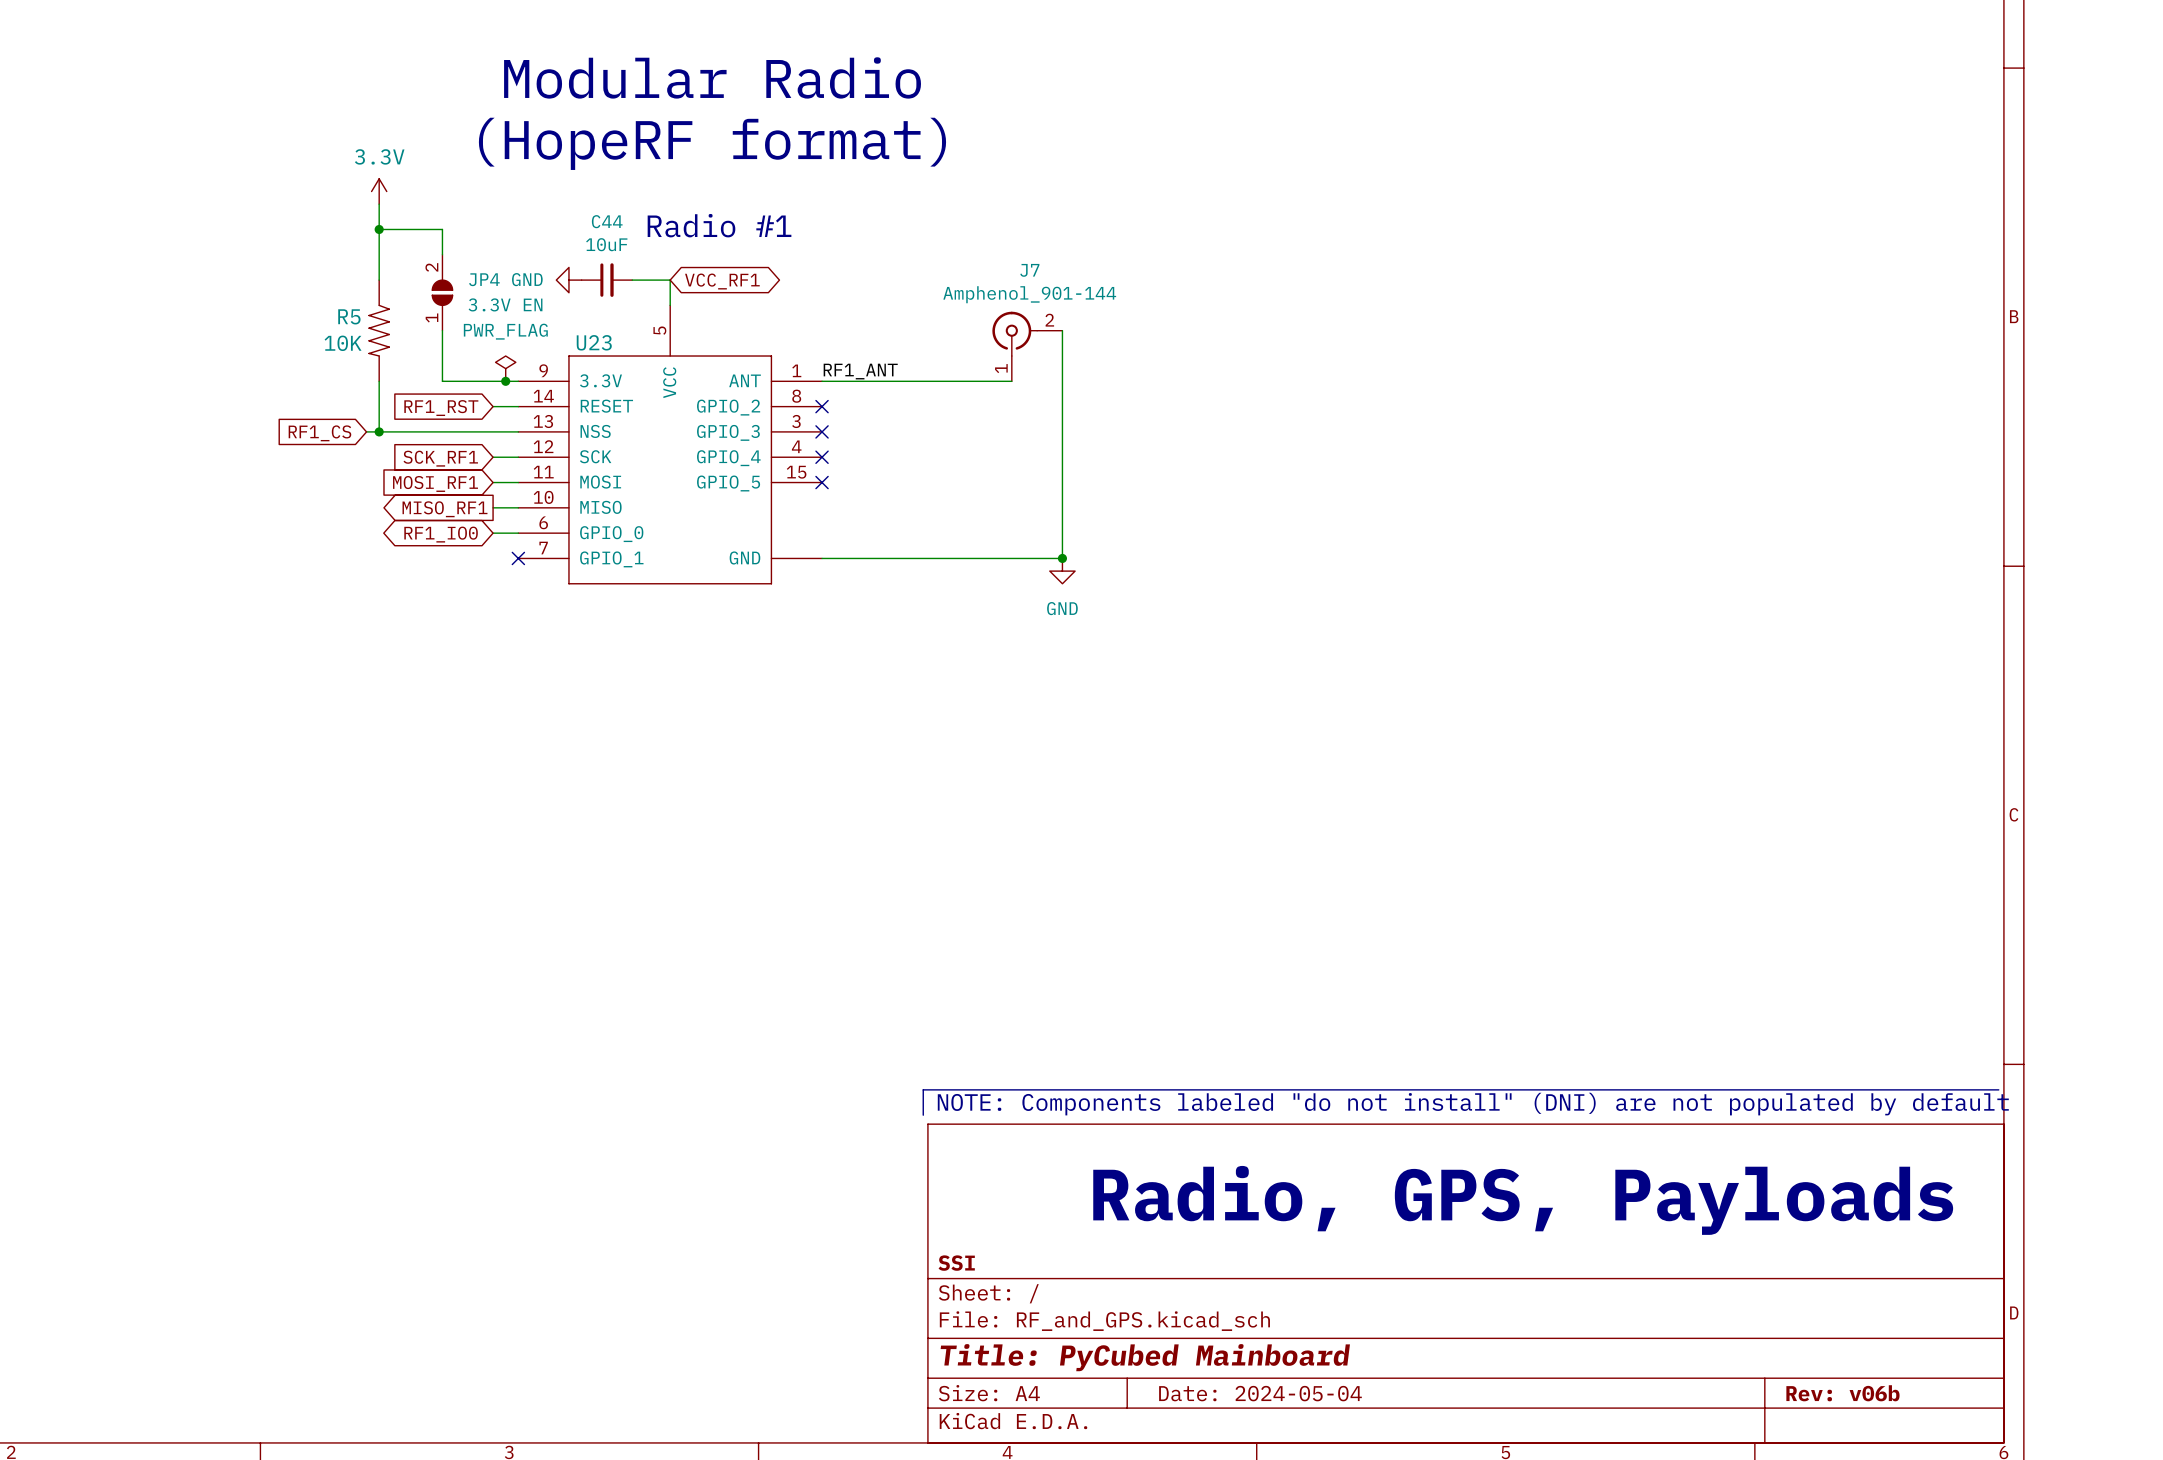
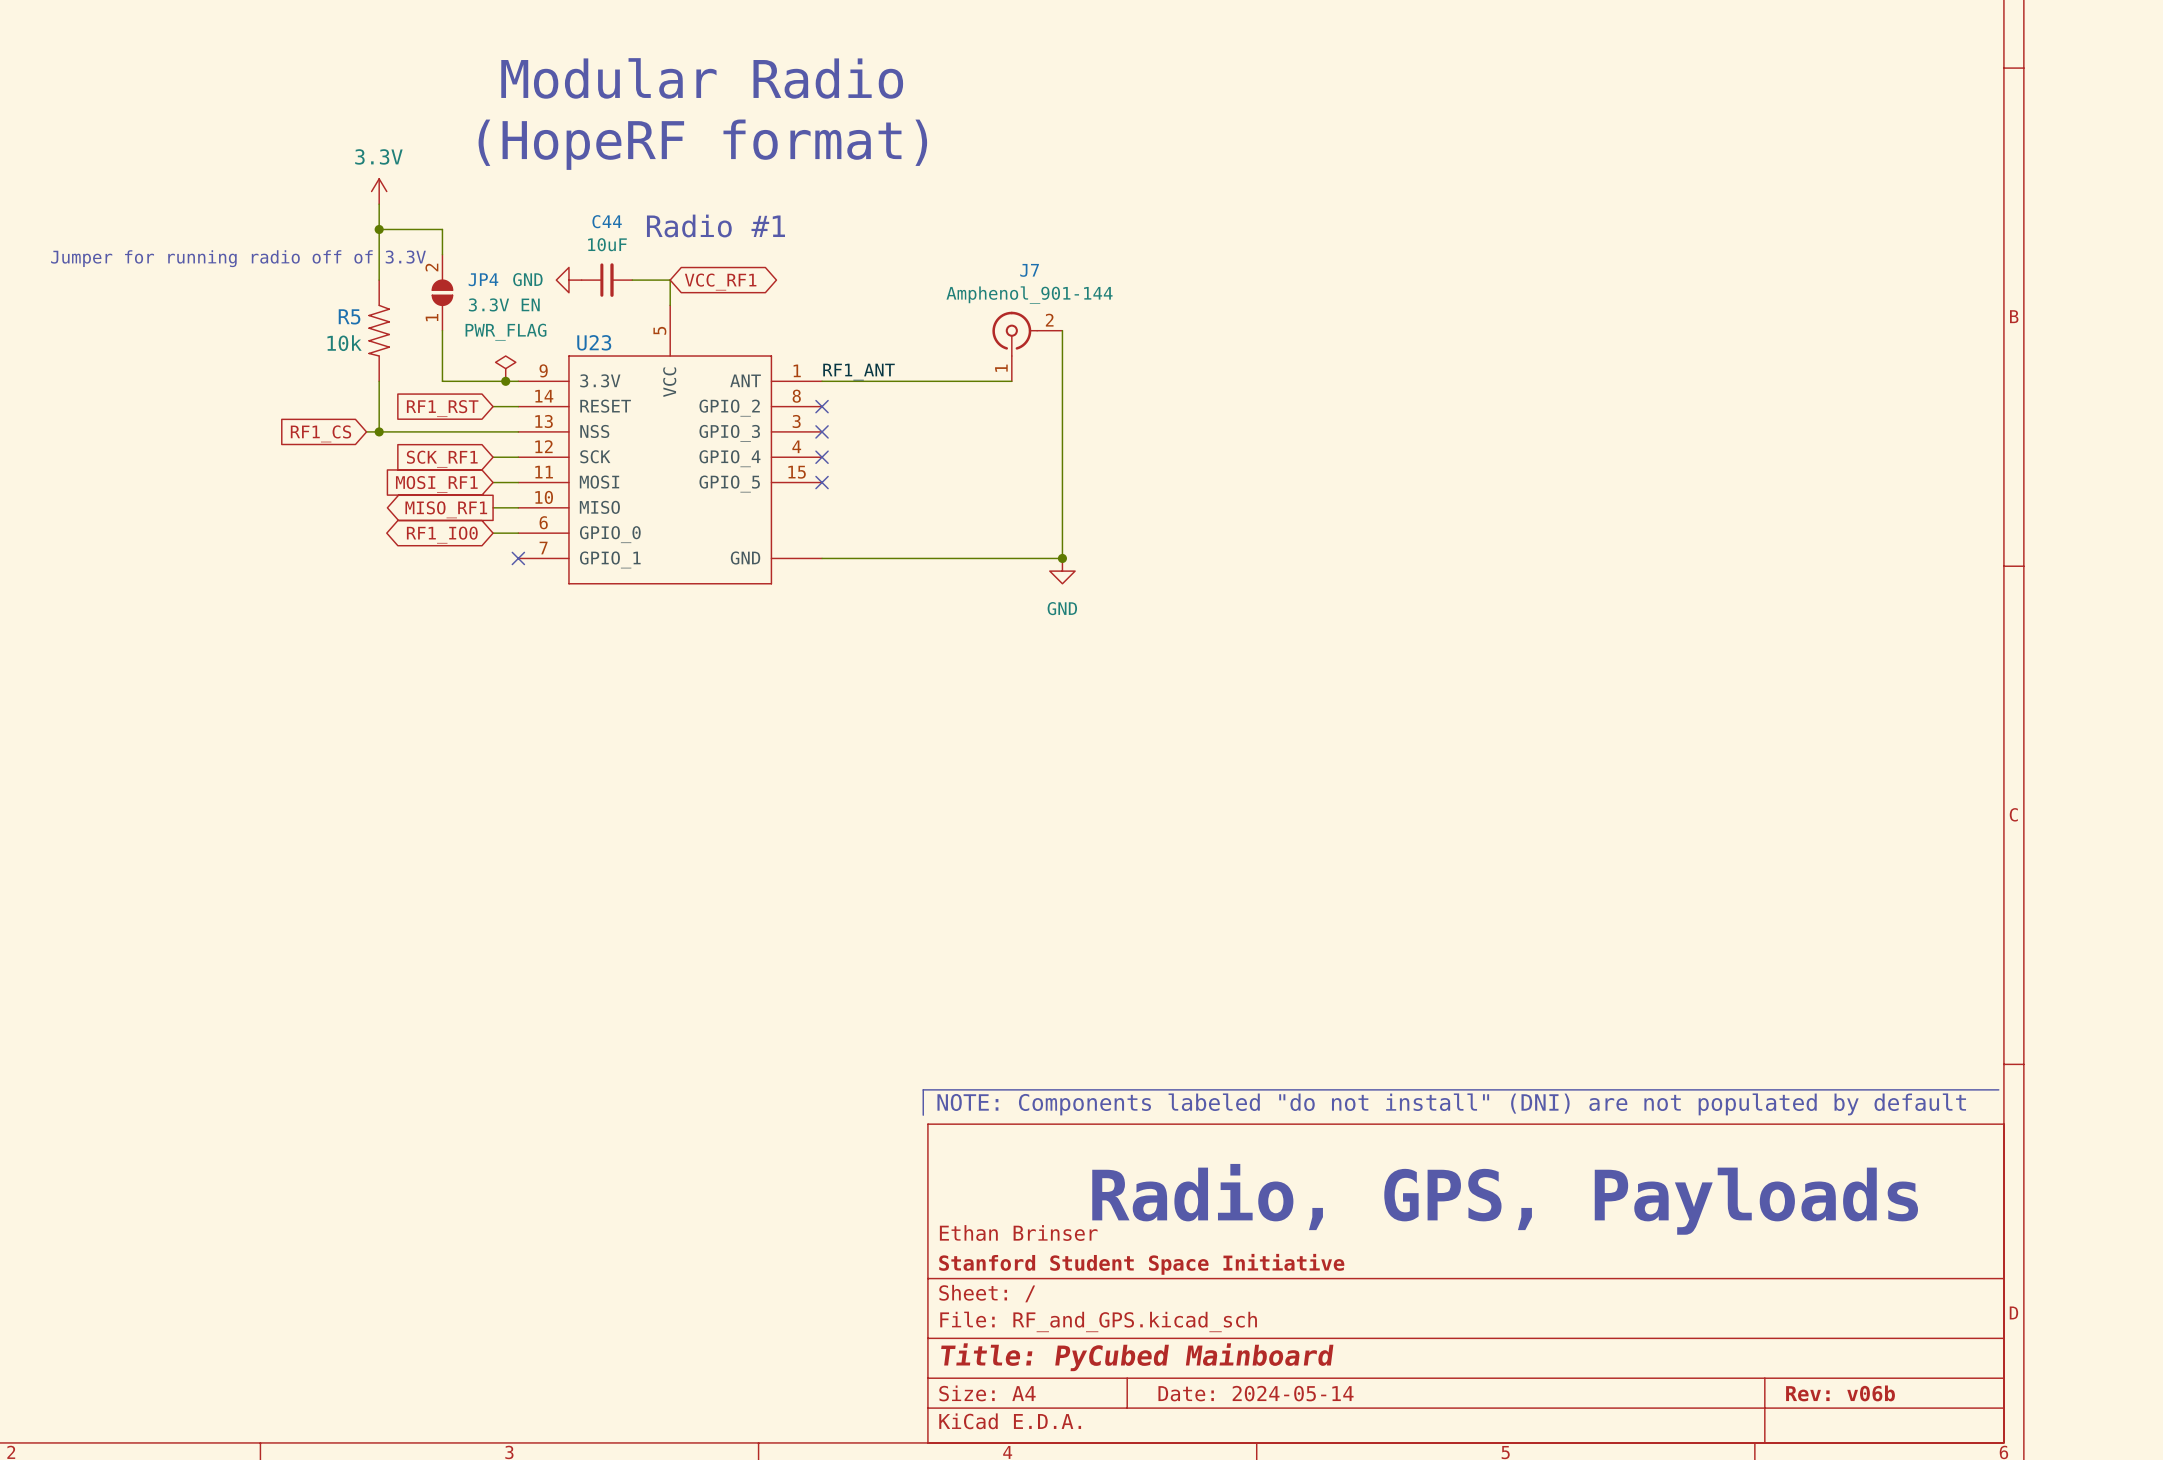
text: none -> Jumper for running radio off of 3.3V (238, 258)
R5 value: 10K (343, 343) -> 10k (344, 343)
title block: none -> Ethan Brinser (1018, 1233)
title block: SSI (956, 1263) -> Stanford Student Space Initiative (1141, 1264)
title block: Date: 2024-05-04 (1260, 1393) -> Date: 2024-05-14 (1256, 1393)

